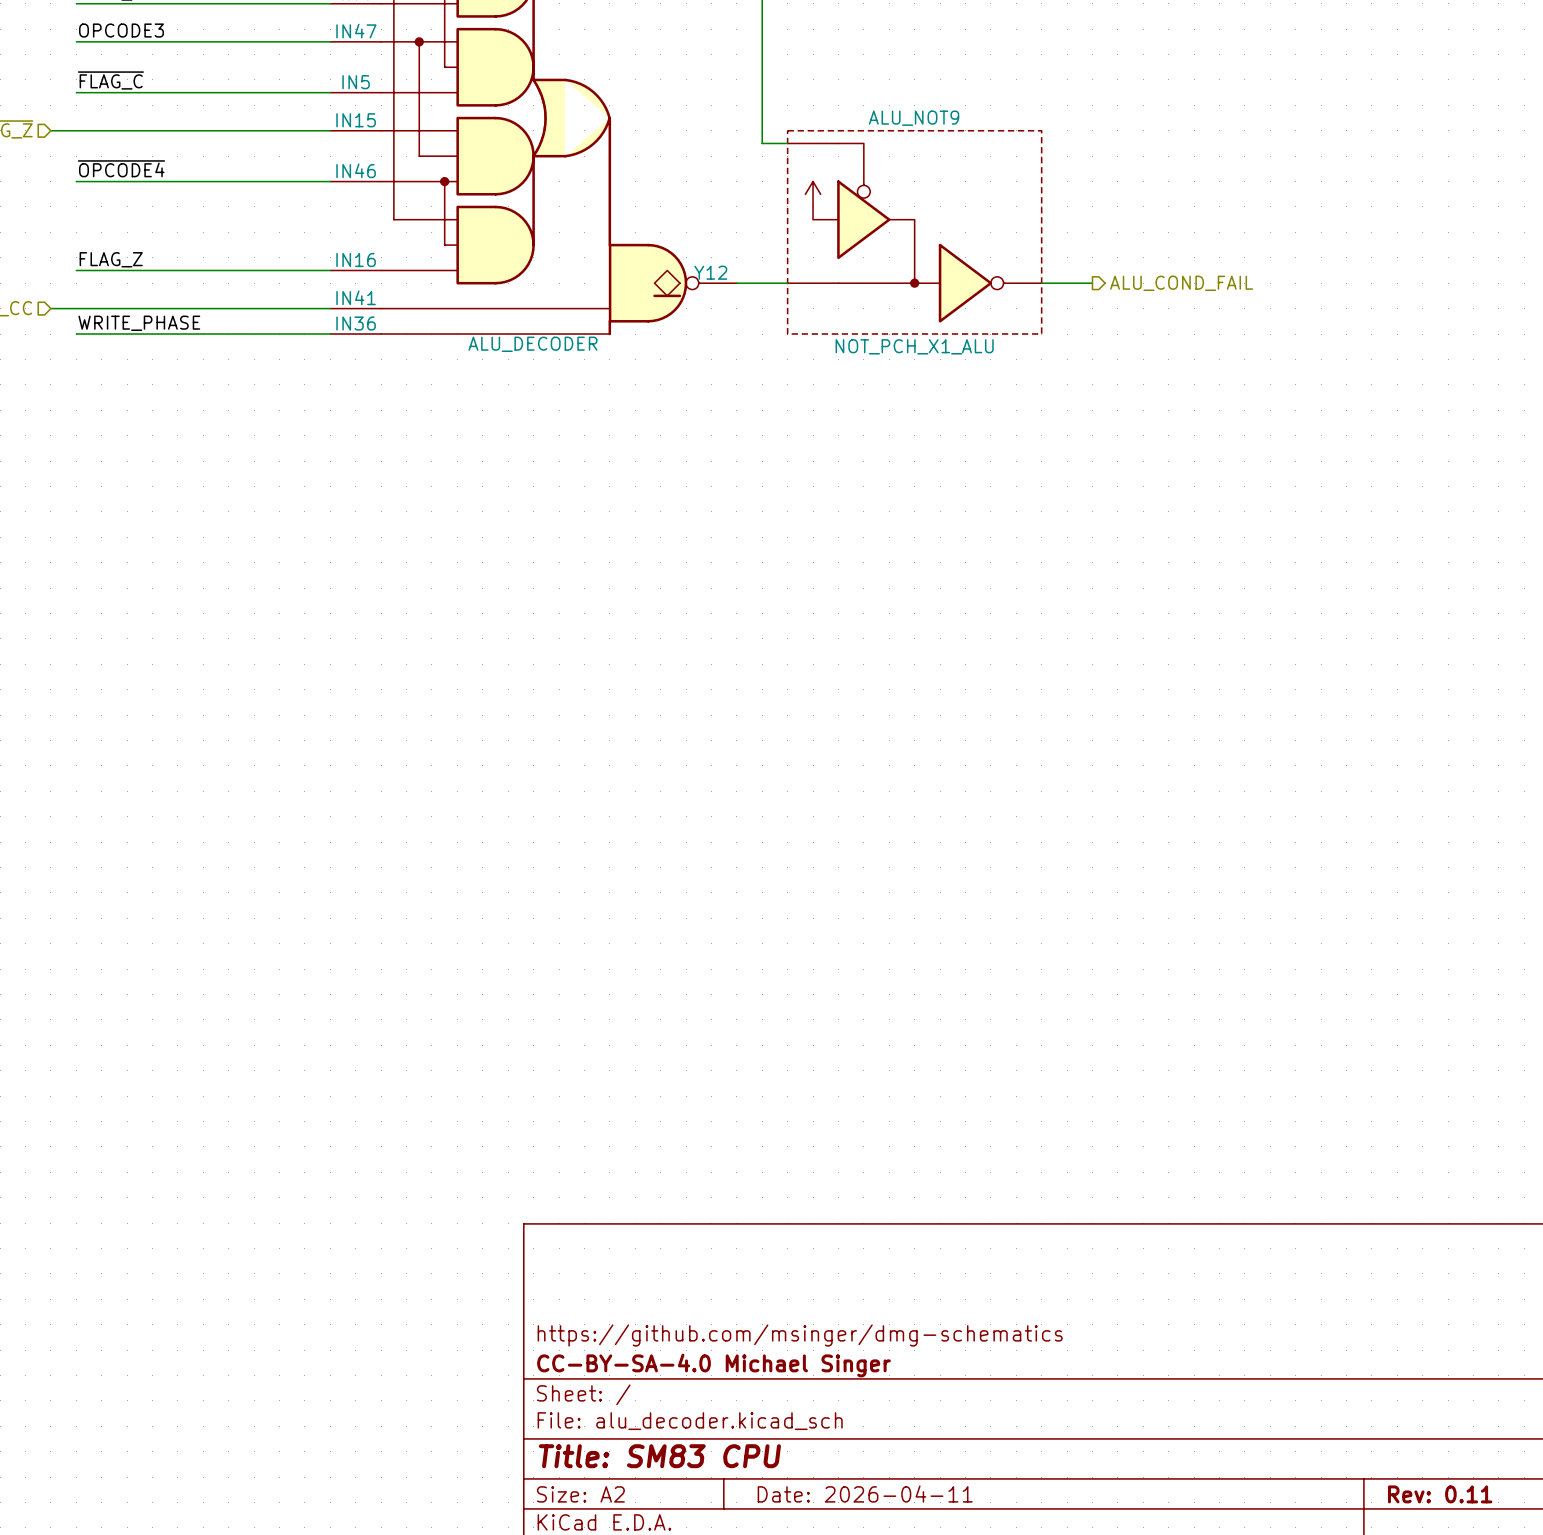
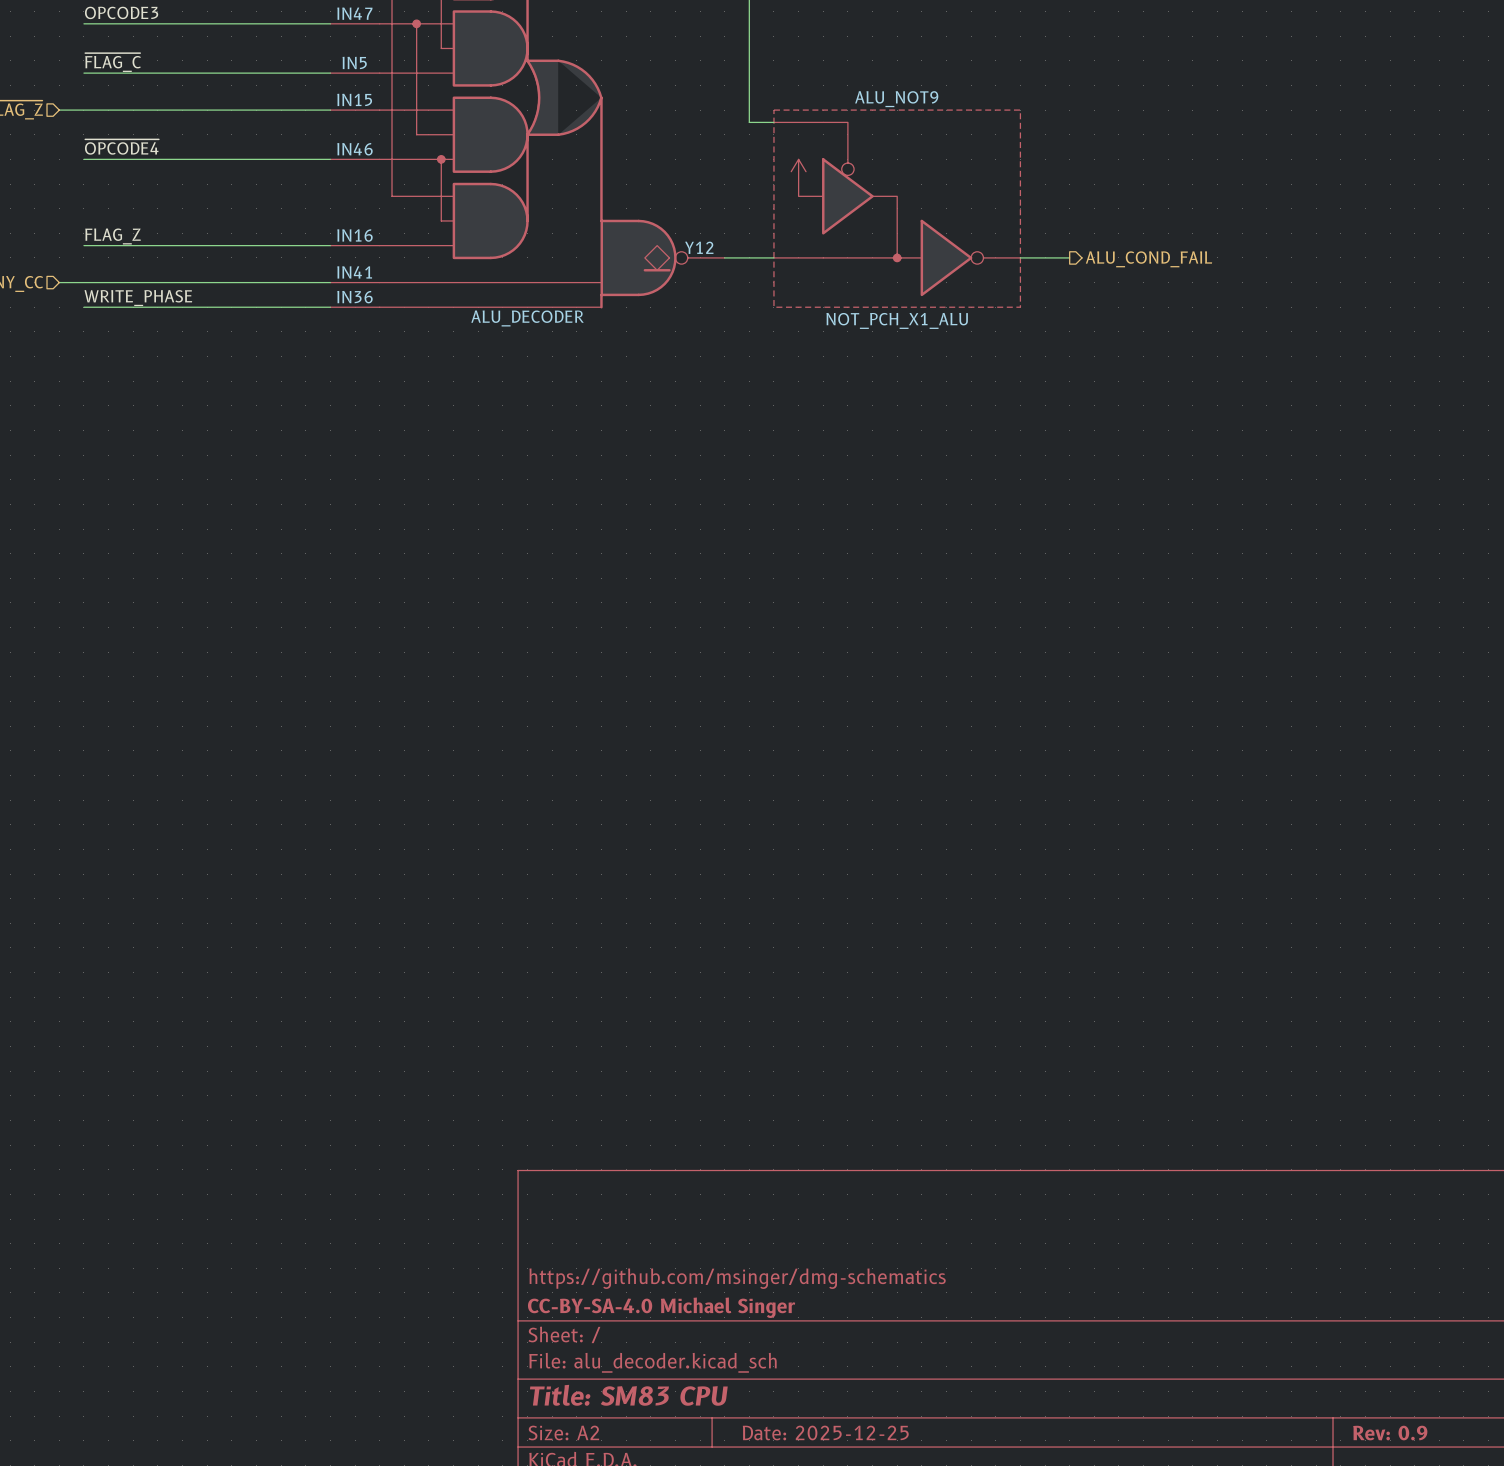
title block: Date: 2026-04-11 (865, 1494) -> Date: 2025-12-25 (825, 1432)
title block: Rev: 0.11 (1440, 1494) -> Rev: 0.9 (1390, 1433)

